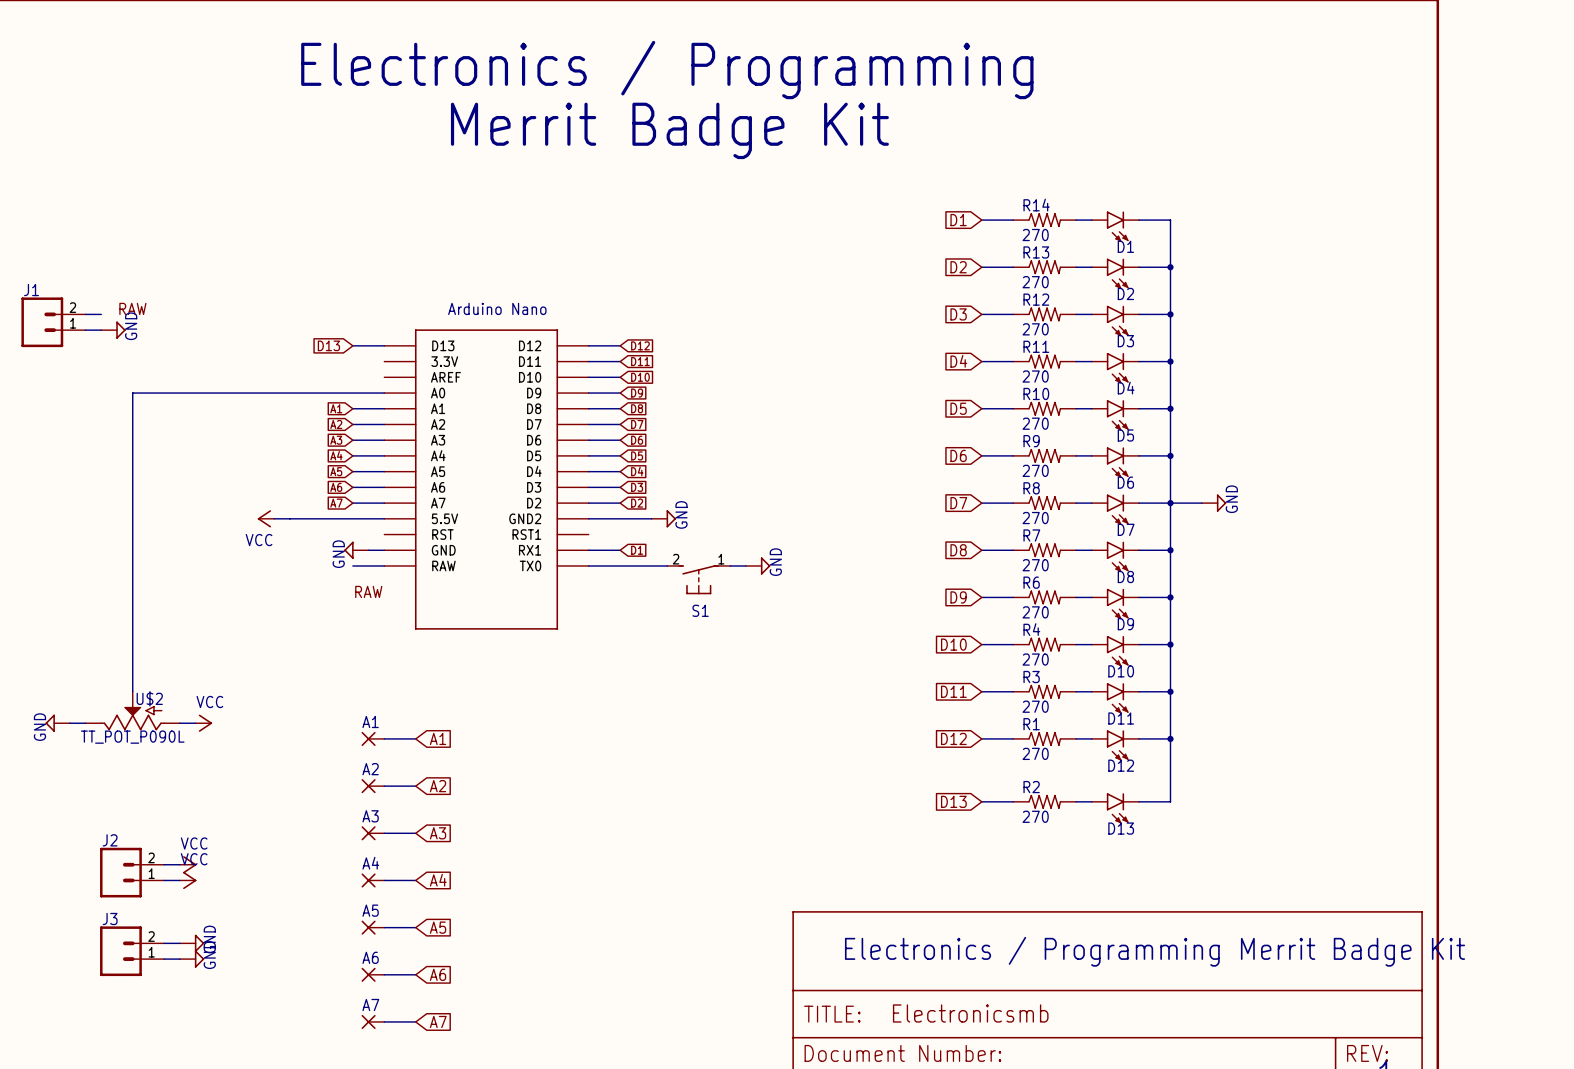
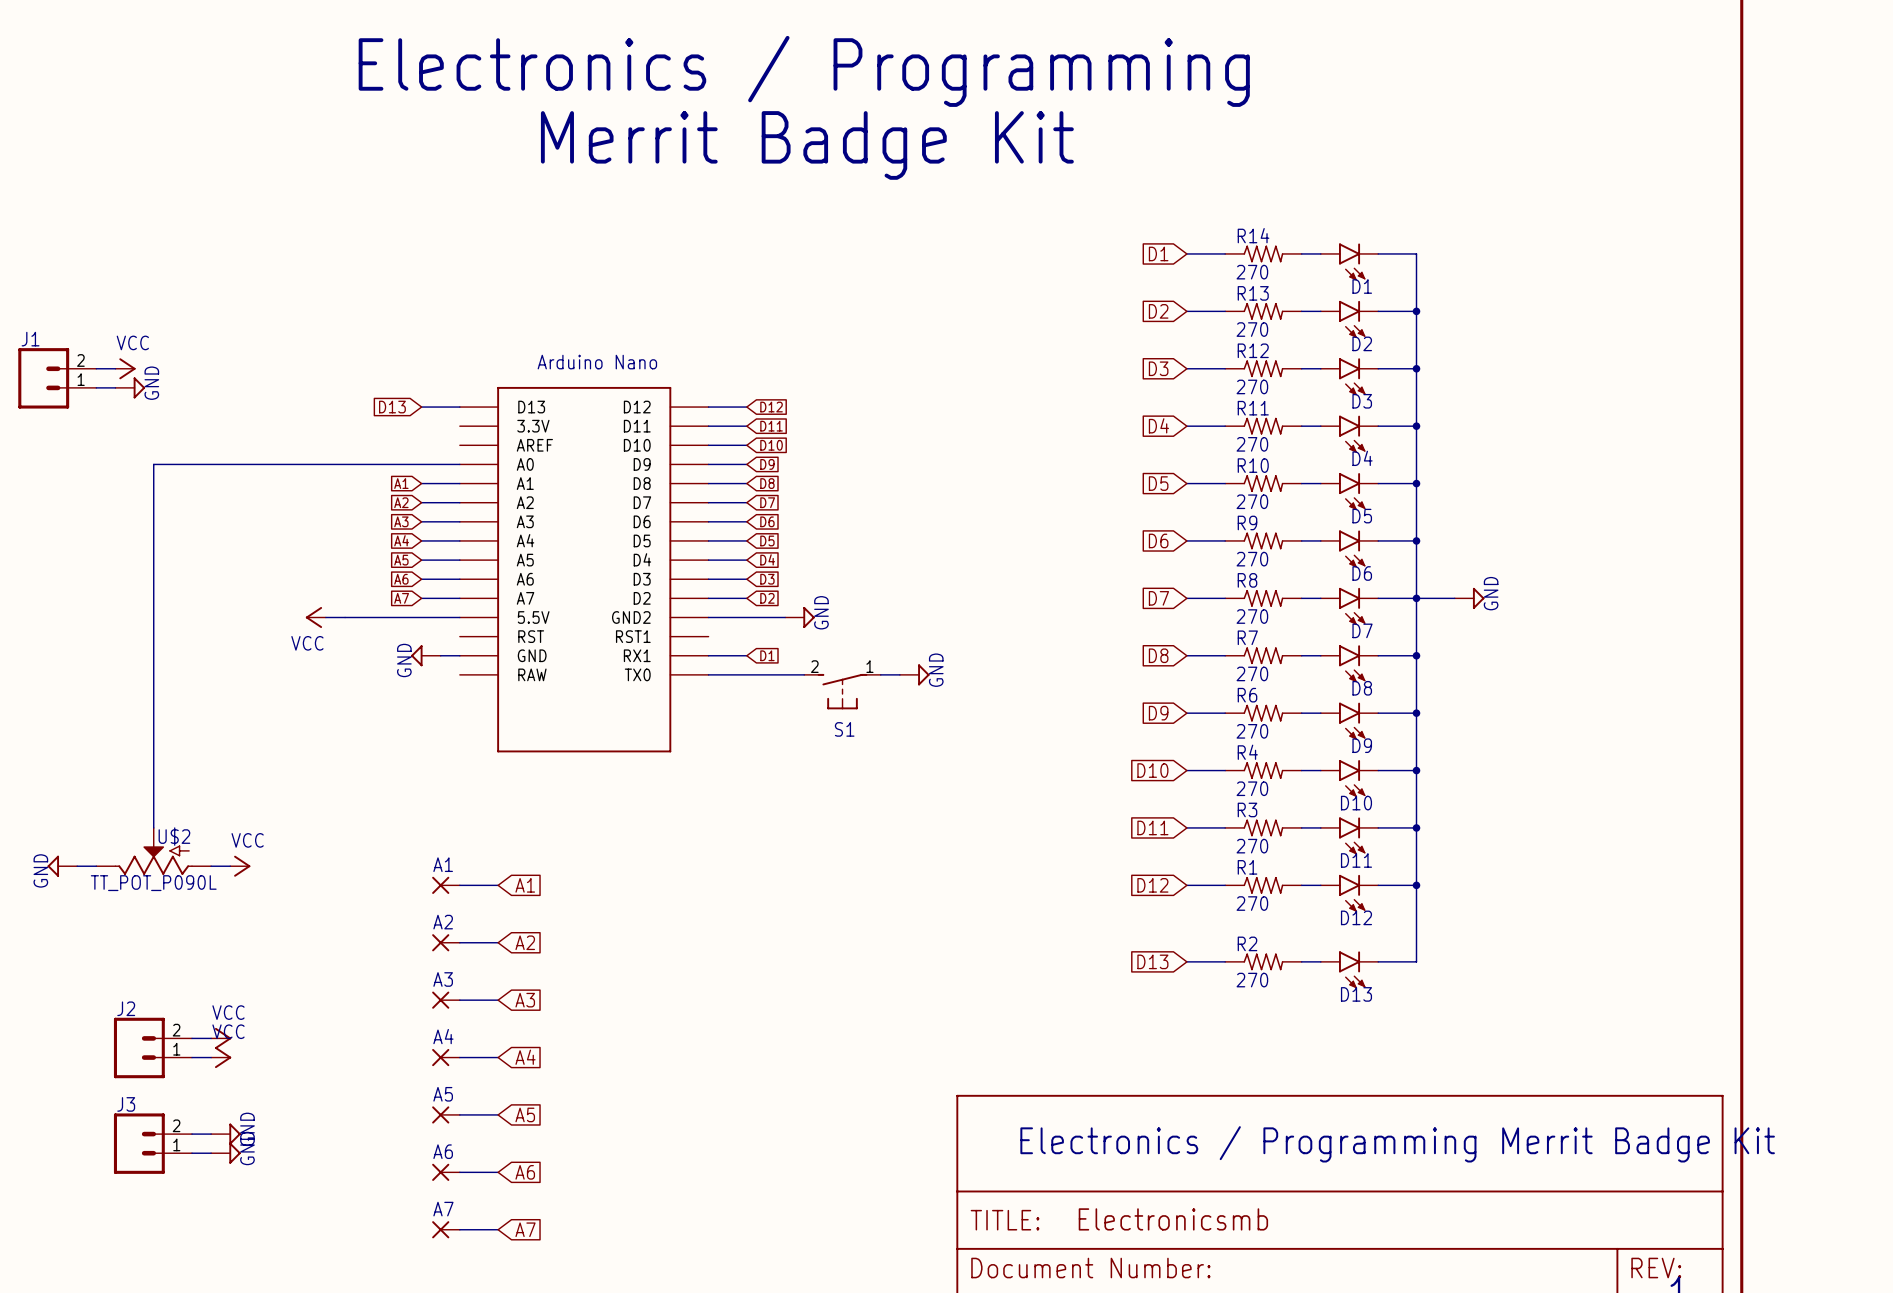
label: RAW (132, 308) -> none
power symbol: none -> VCC (125, 368)
wire: (352, 565) (384, 565) -> none
label: RAW (368, 591) -> none

